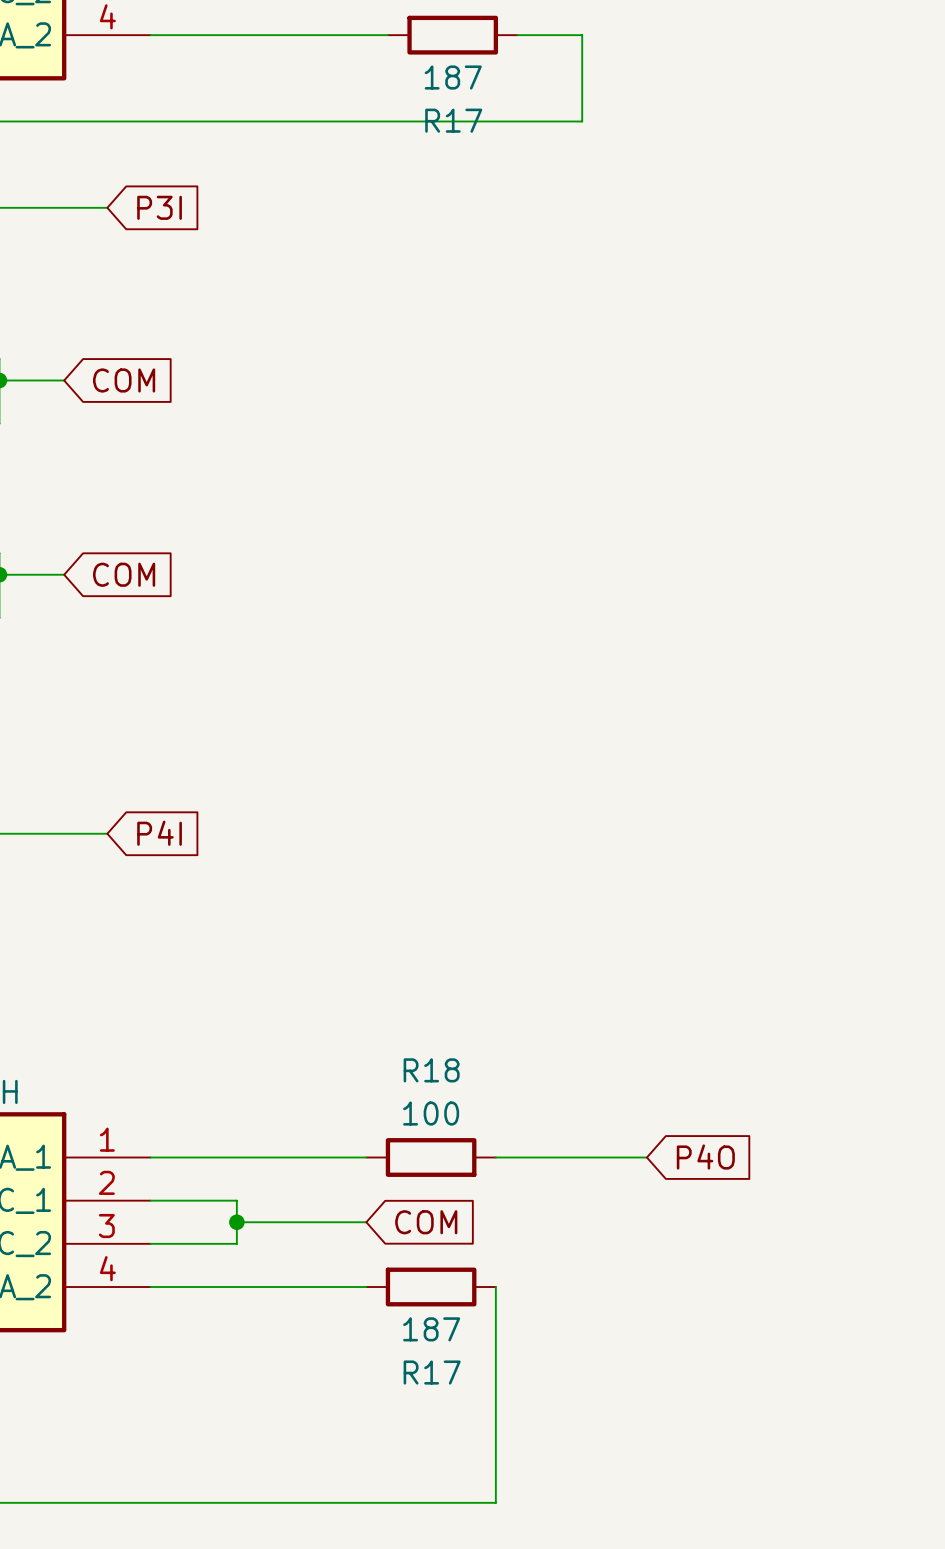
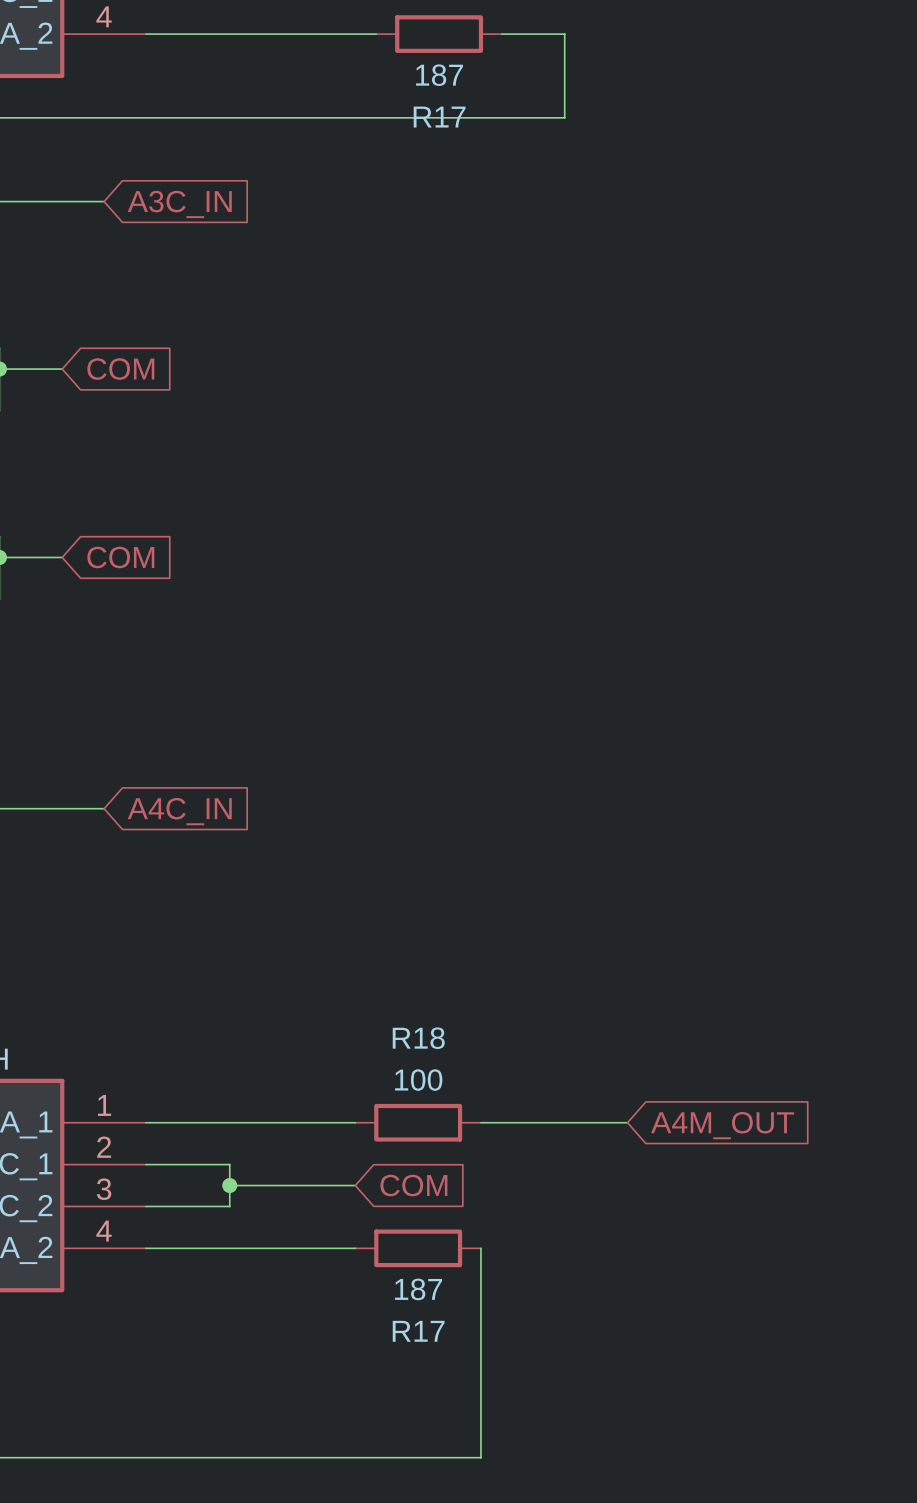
global label: P3I (159, 207) -> A3C_IN (179, 204)
global label: P4I (159, 833) -> A4C_IN (179, 811)
global label: P4O (705, 1156) -> A4M_OUT (722, 1125)

